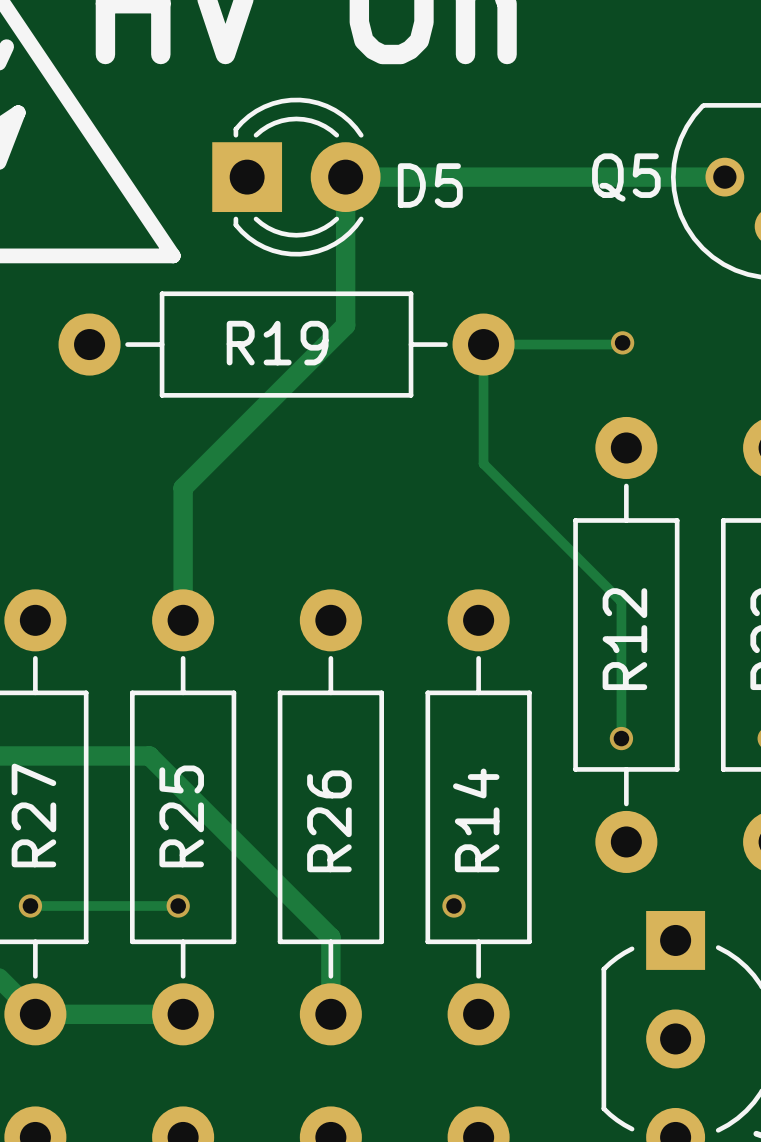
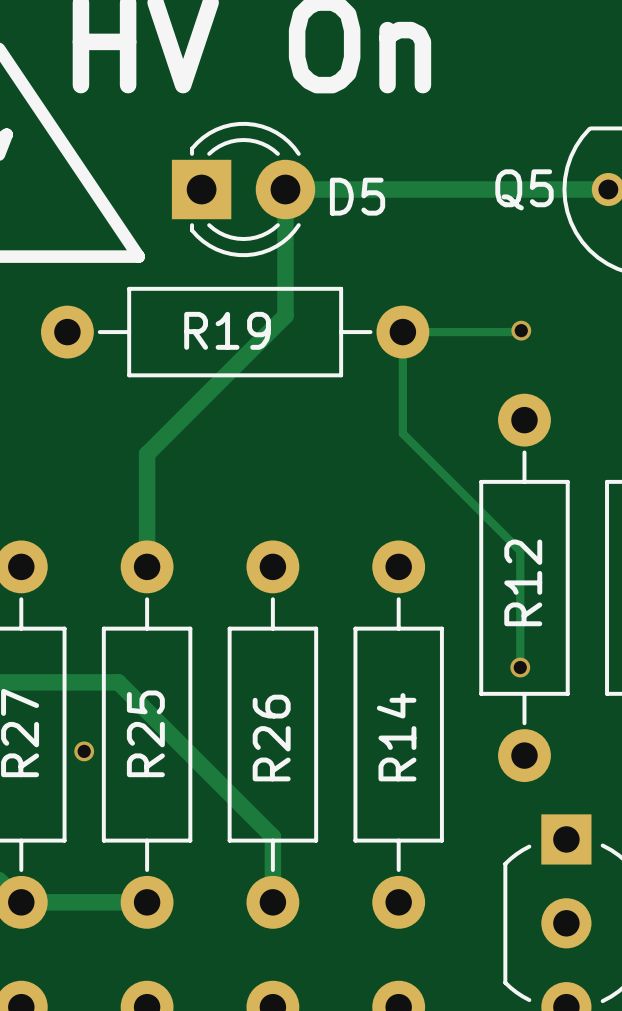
via: none -> (84, 751)
track: (30, 905) (178, 905) -> none
via: (30, 905) -> none
via: (178, 905) -> none
via: (453, 905) -> none

